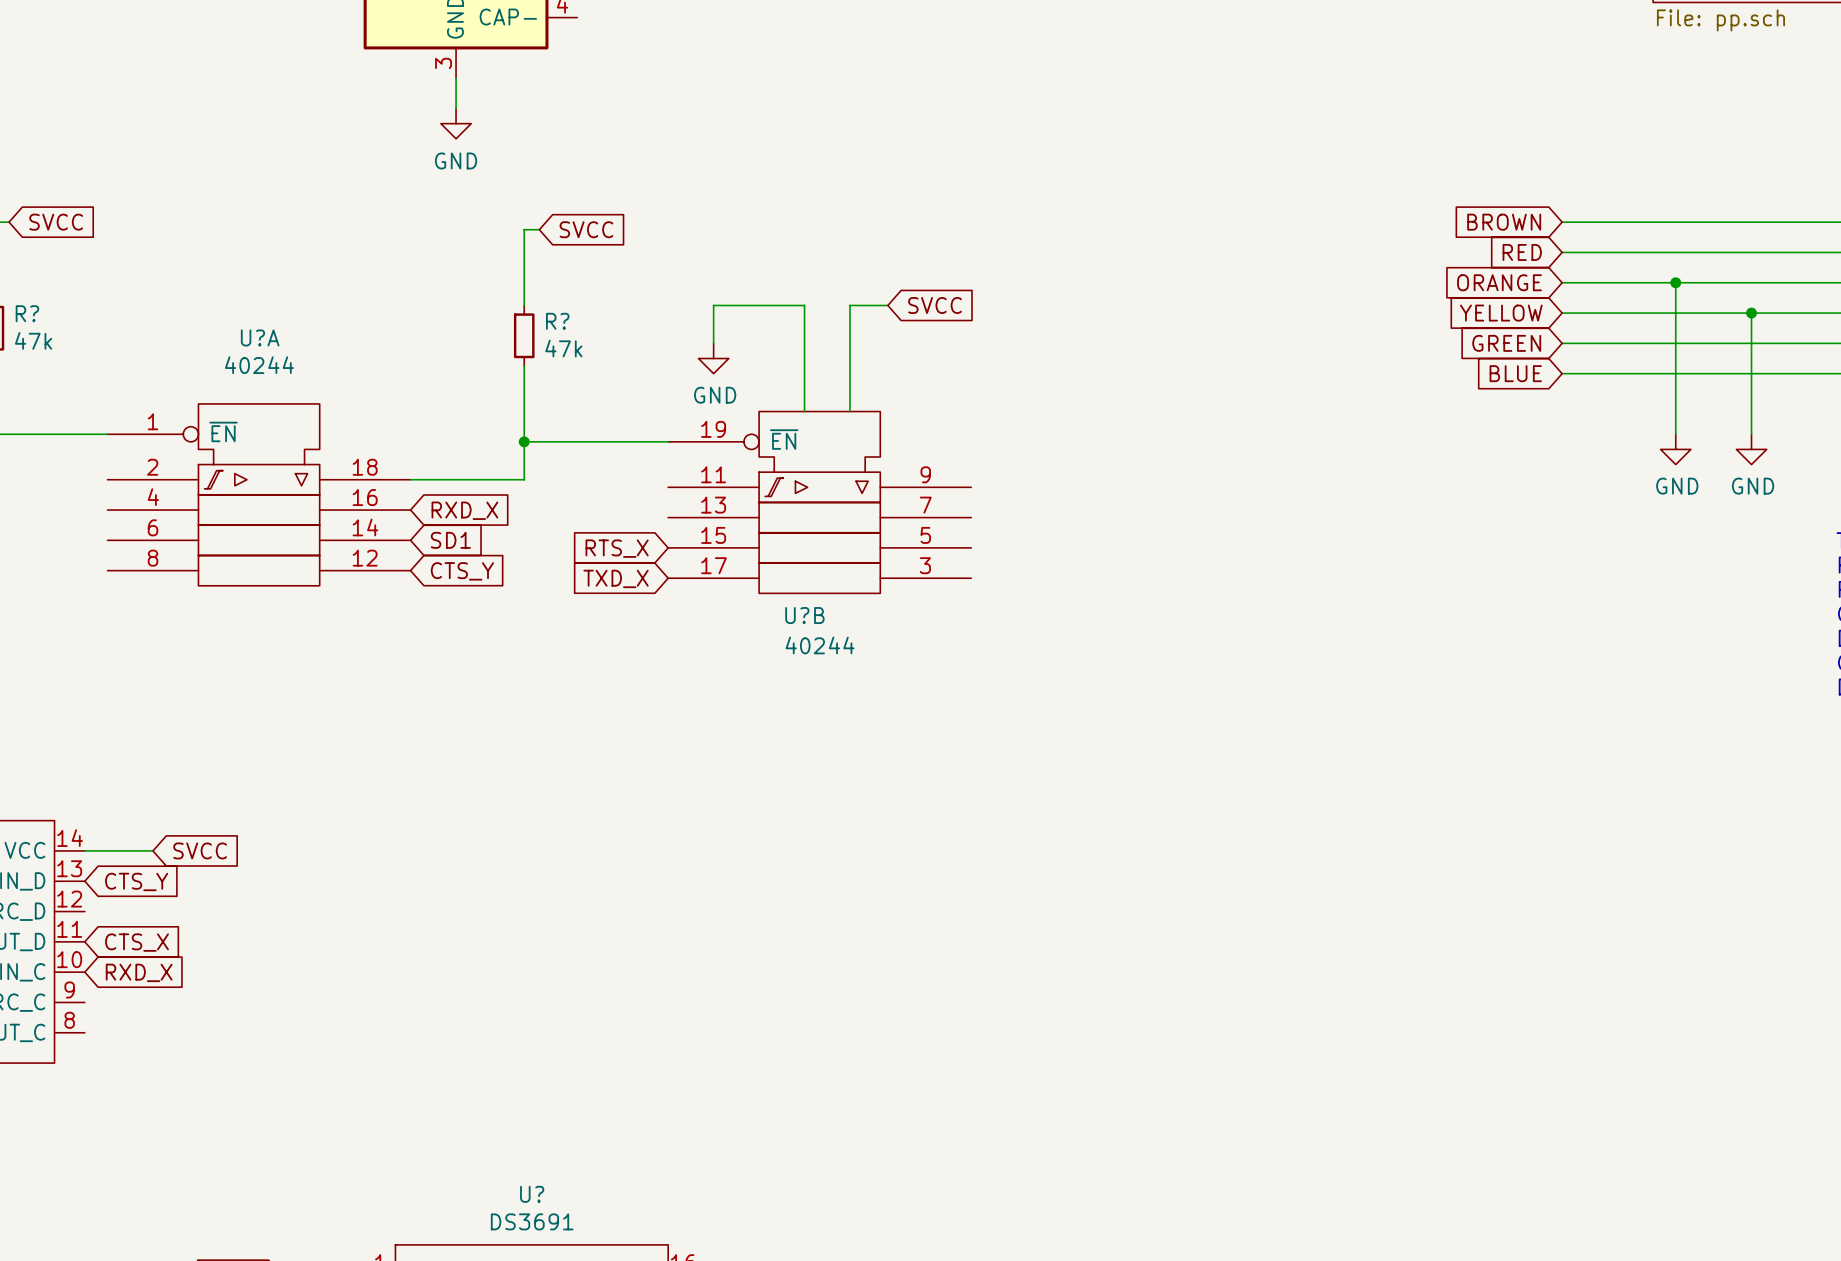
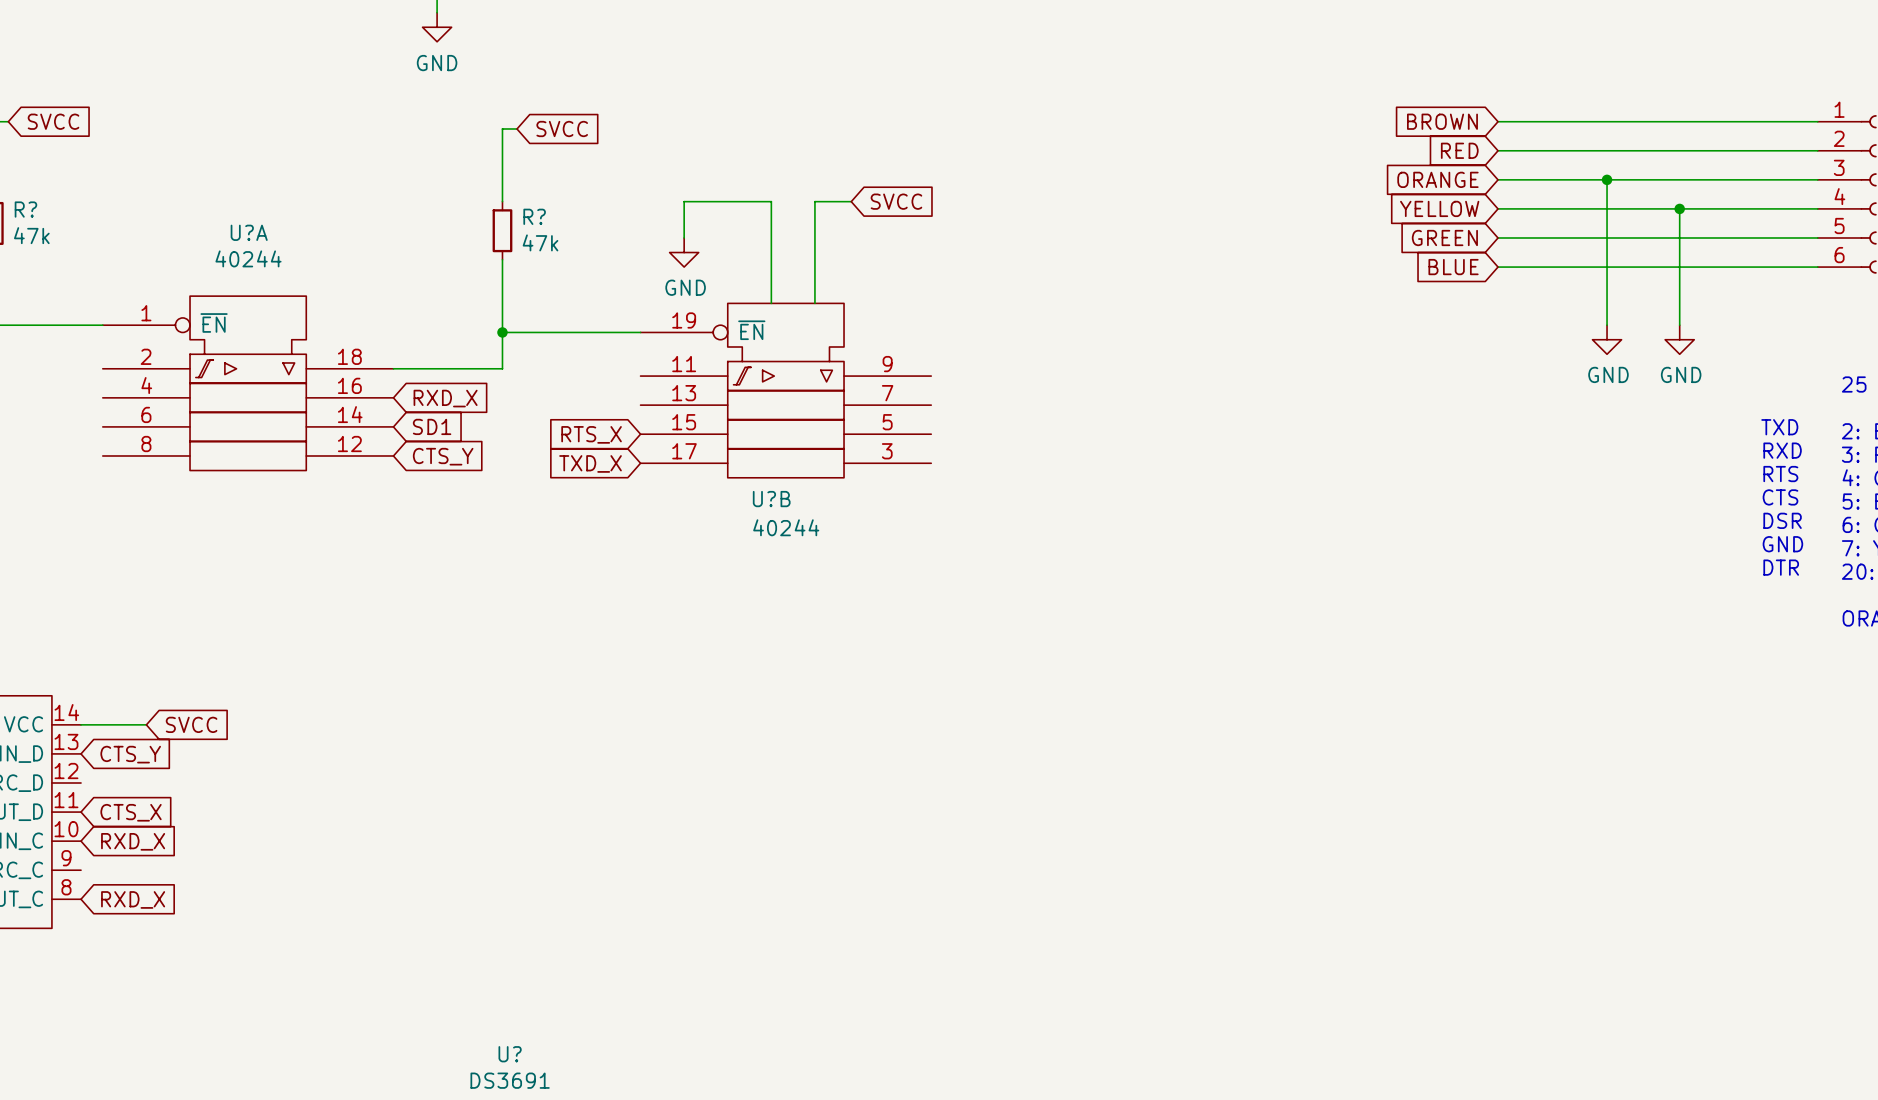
global label: none -> RXD_X (133, 899)

